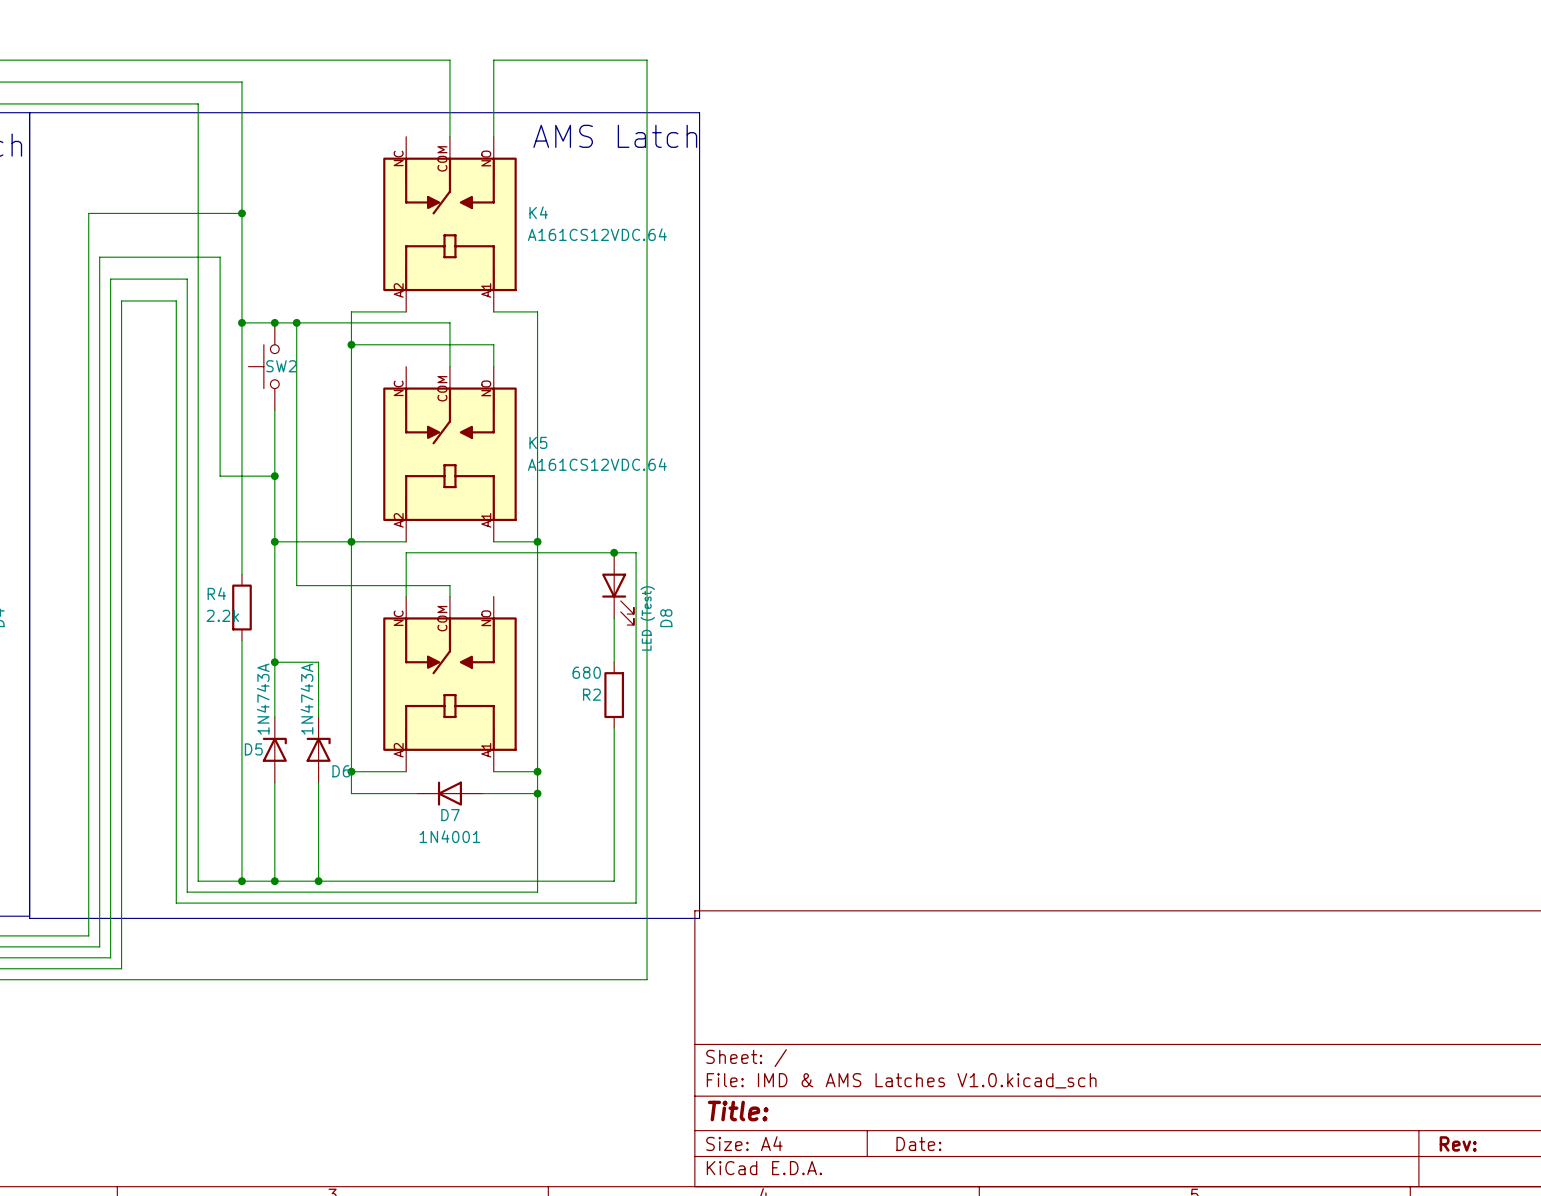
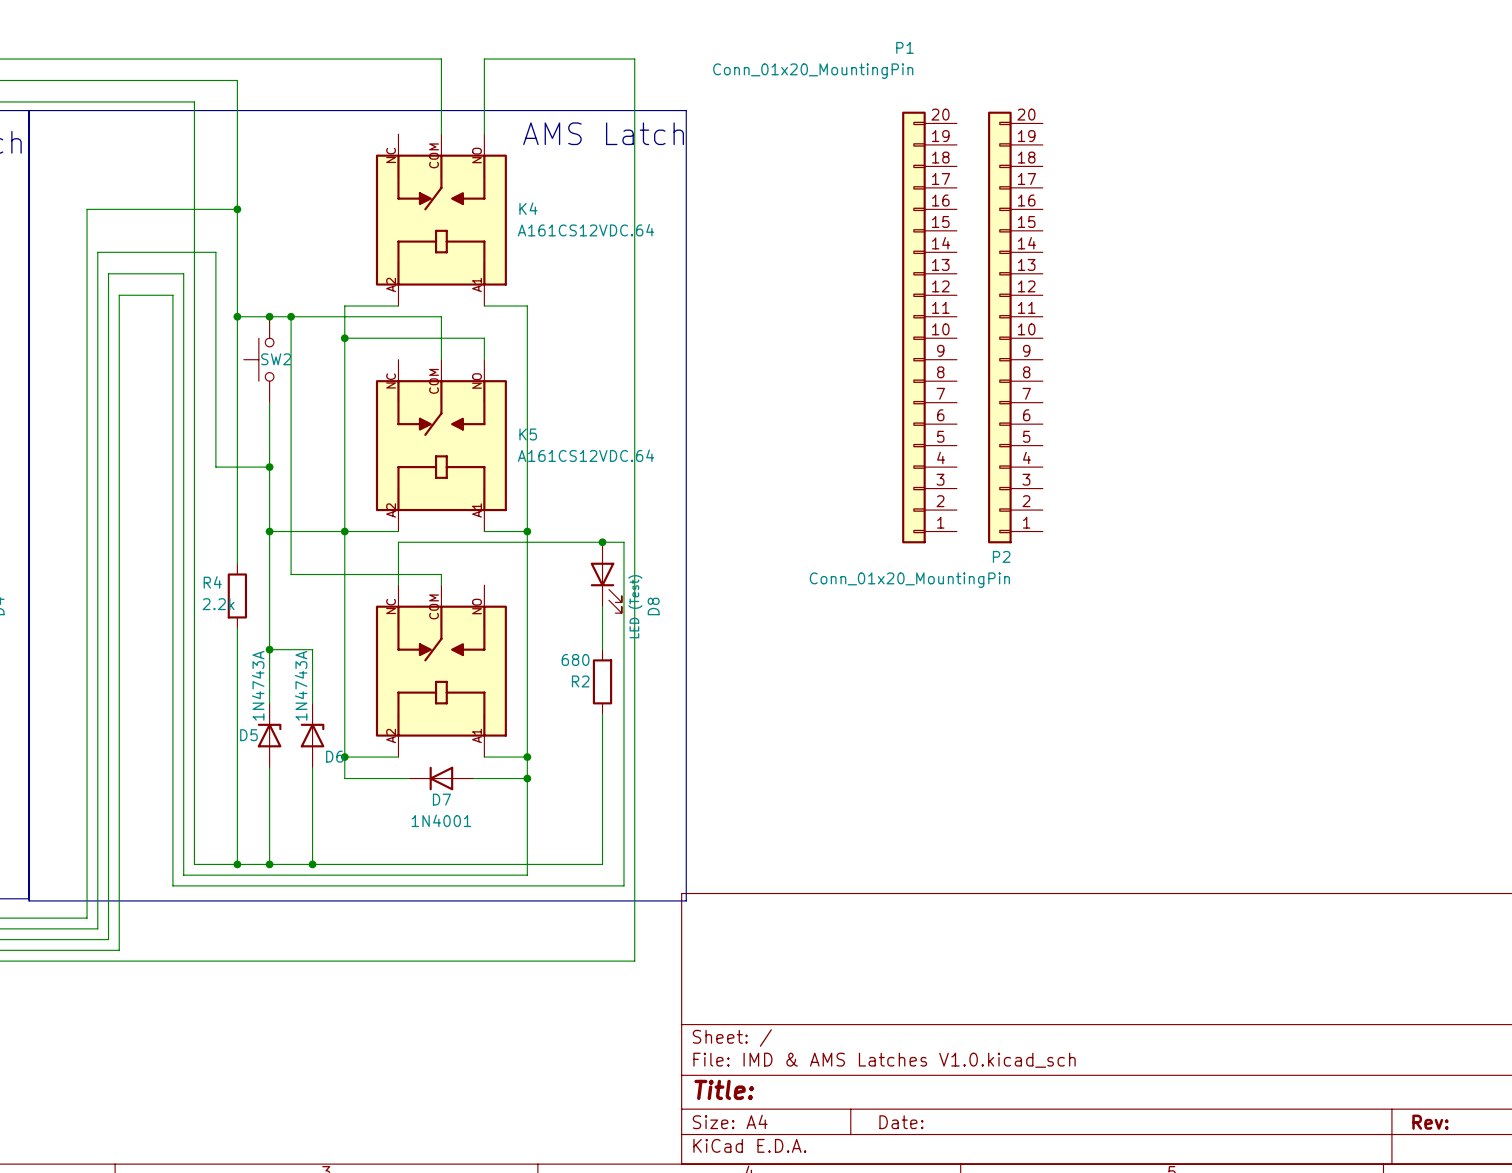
P1: none -> Conn_01x20_MountingPin (929, 327)
P2: none -> Conn_01x20_MountingPin (1015, 327)

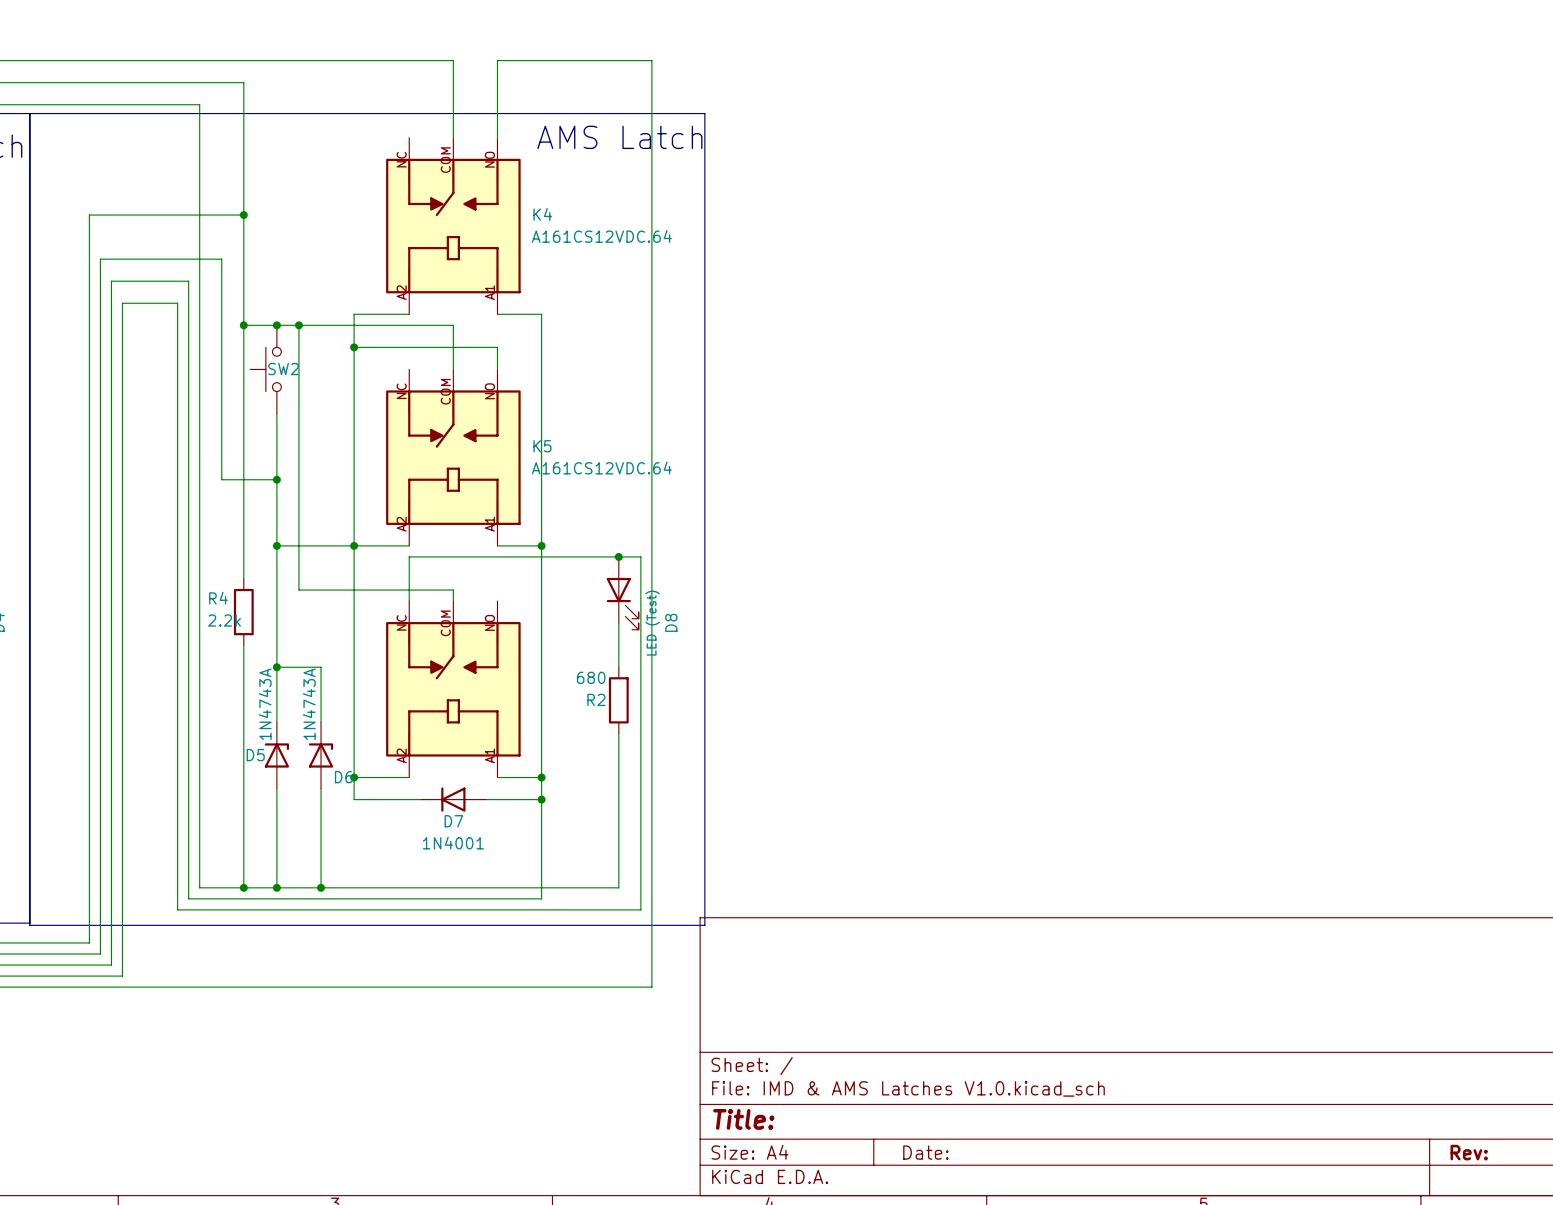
P1: Conn_01x20_MountingPin (929, 327) -> none
P2: Conn_01x20_MountingPin (1015, 327) -> none

